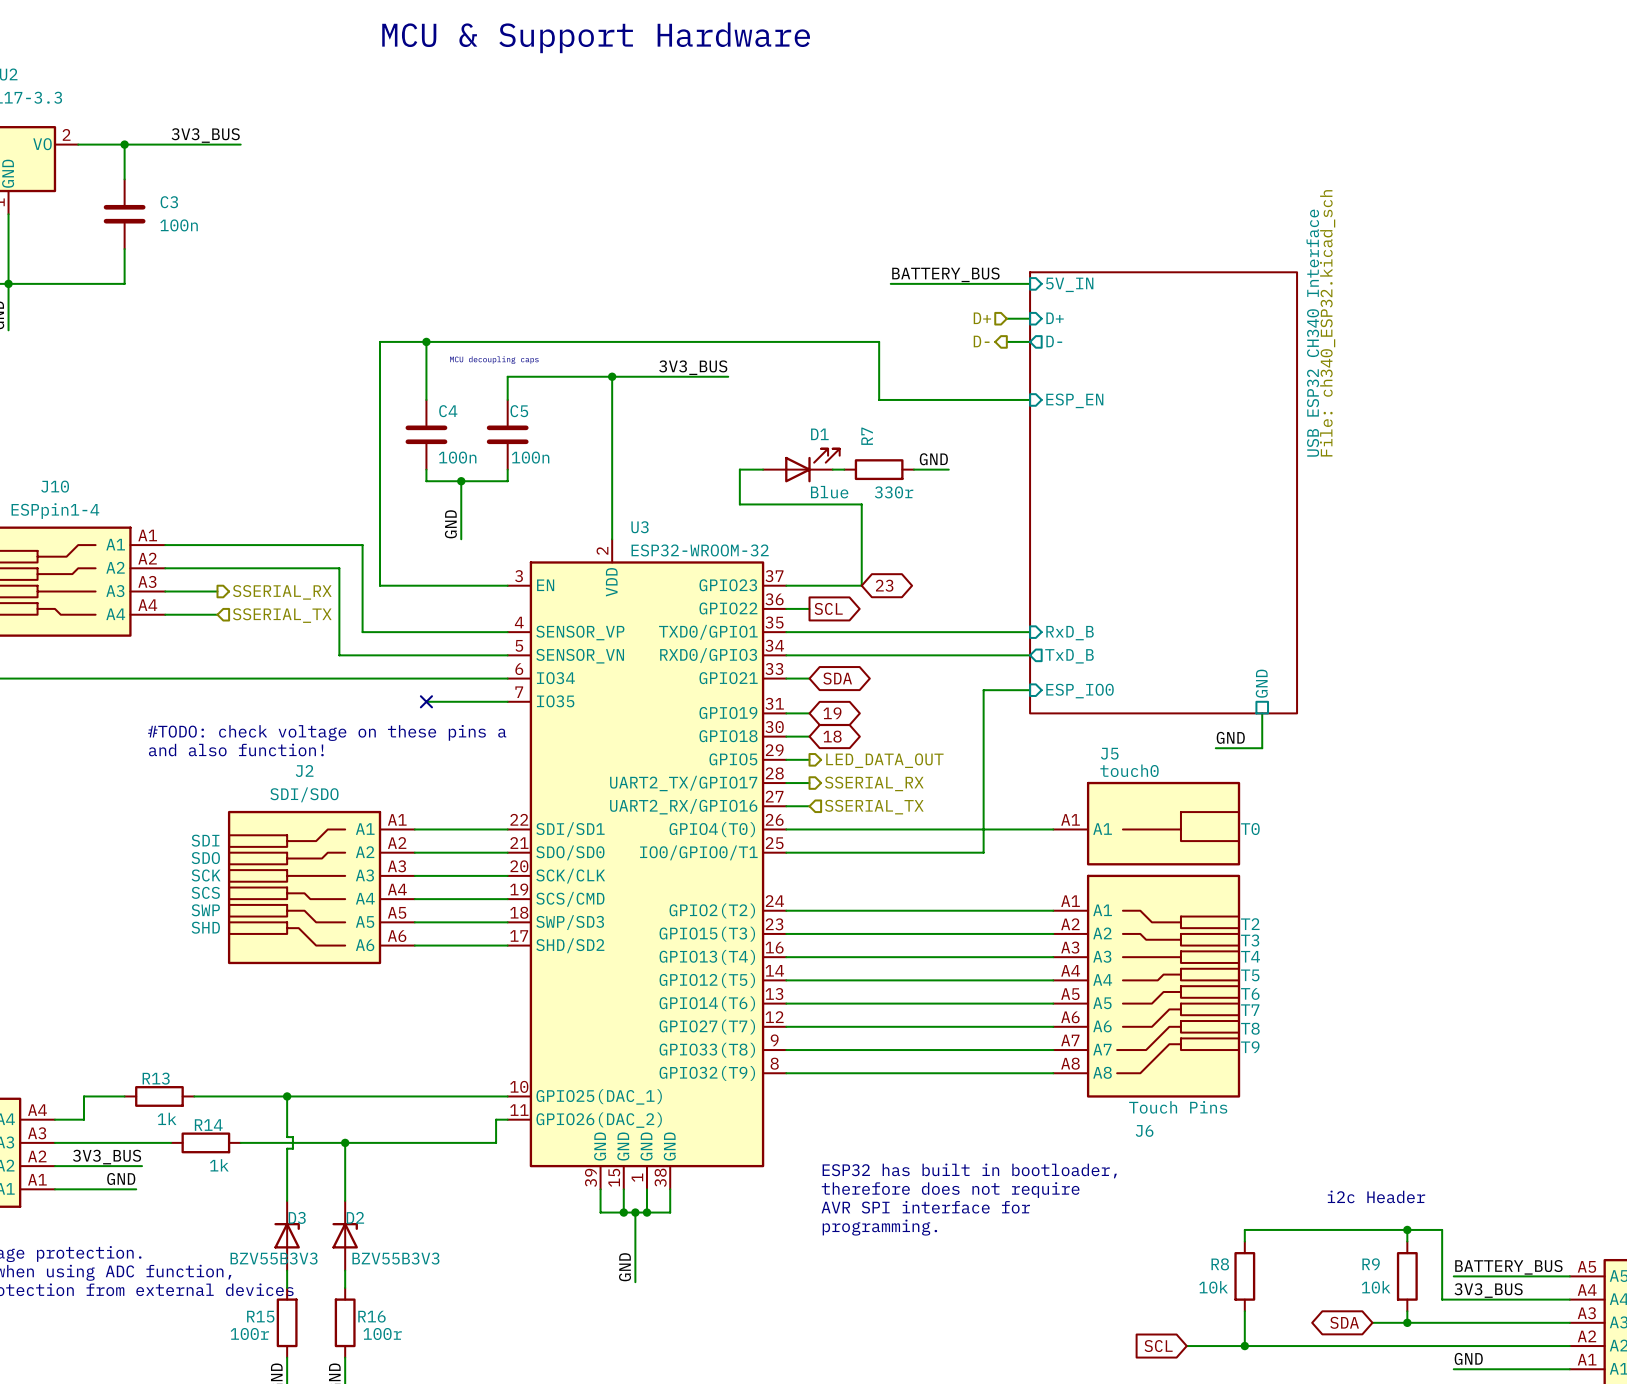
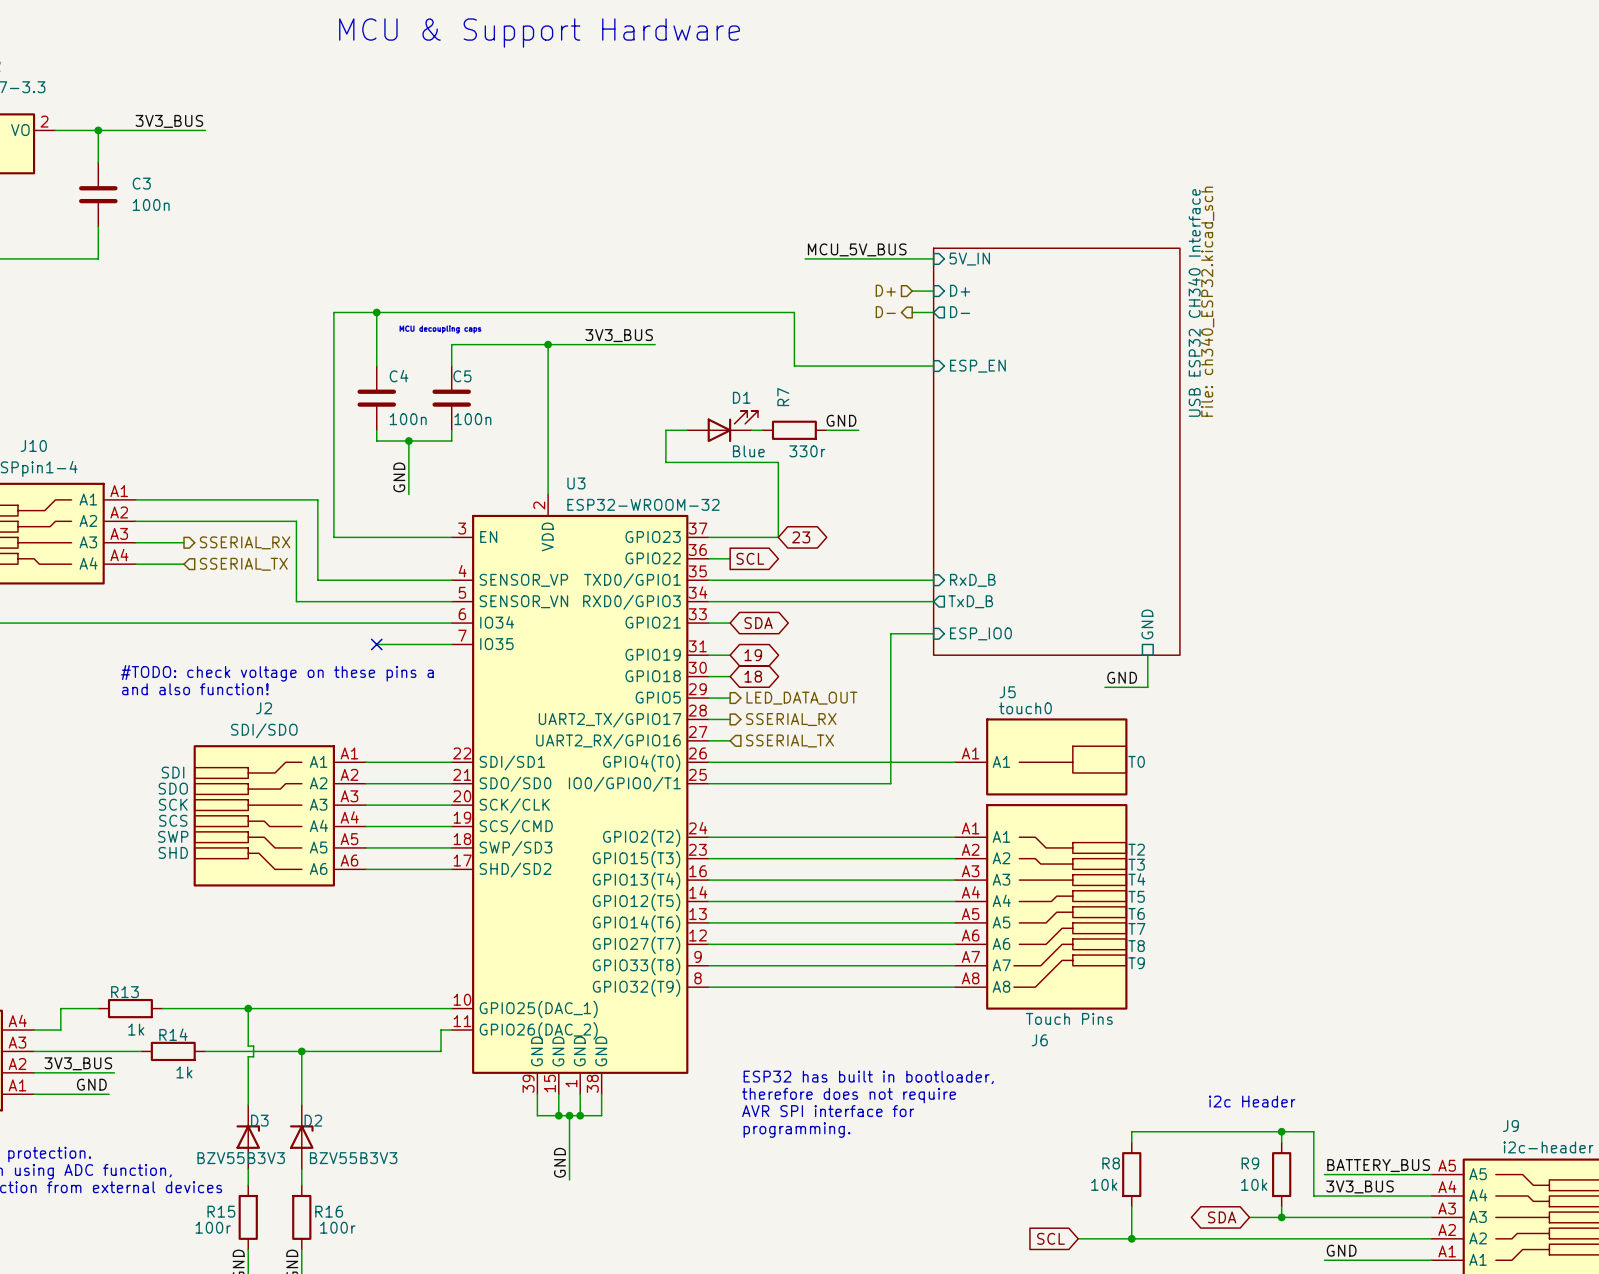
label: BATTERY_BUS (945, 274) -> MCU_5V_BUS (857, 249)

